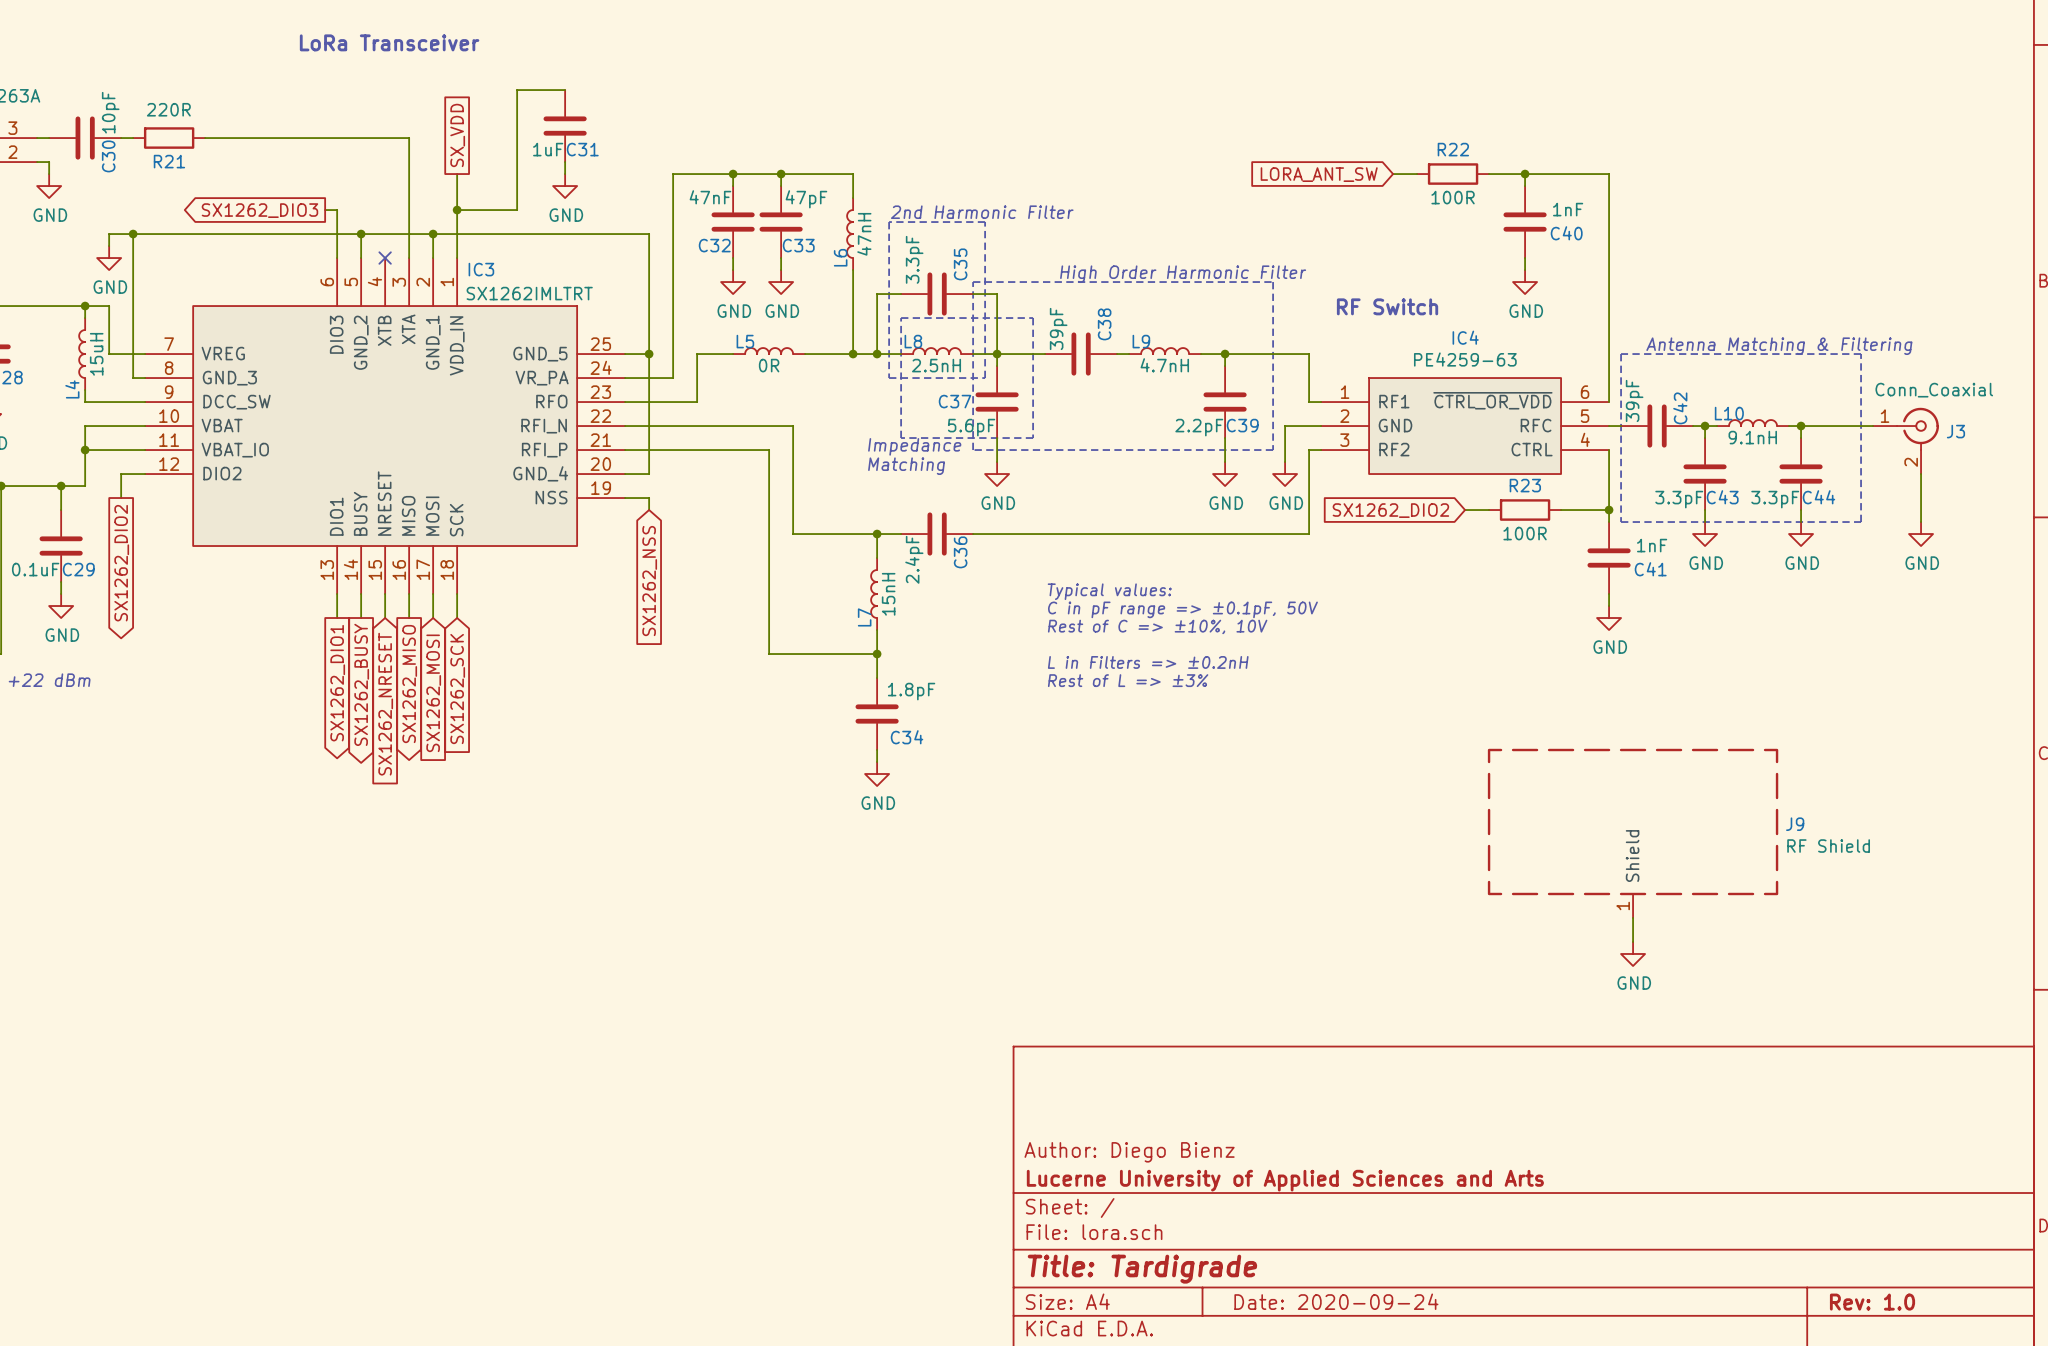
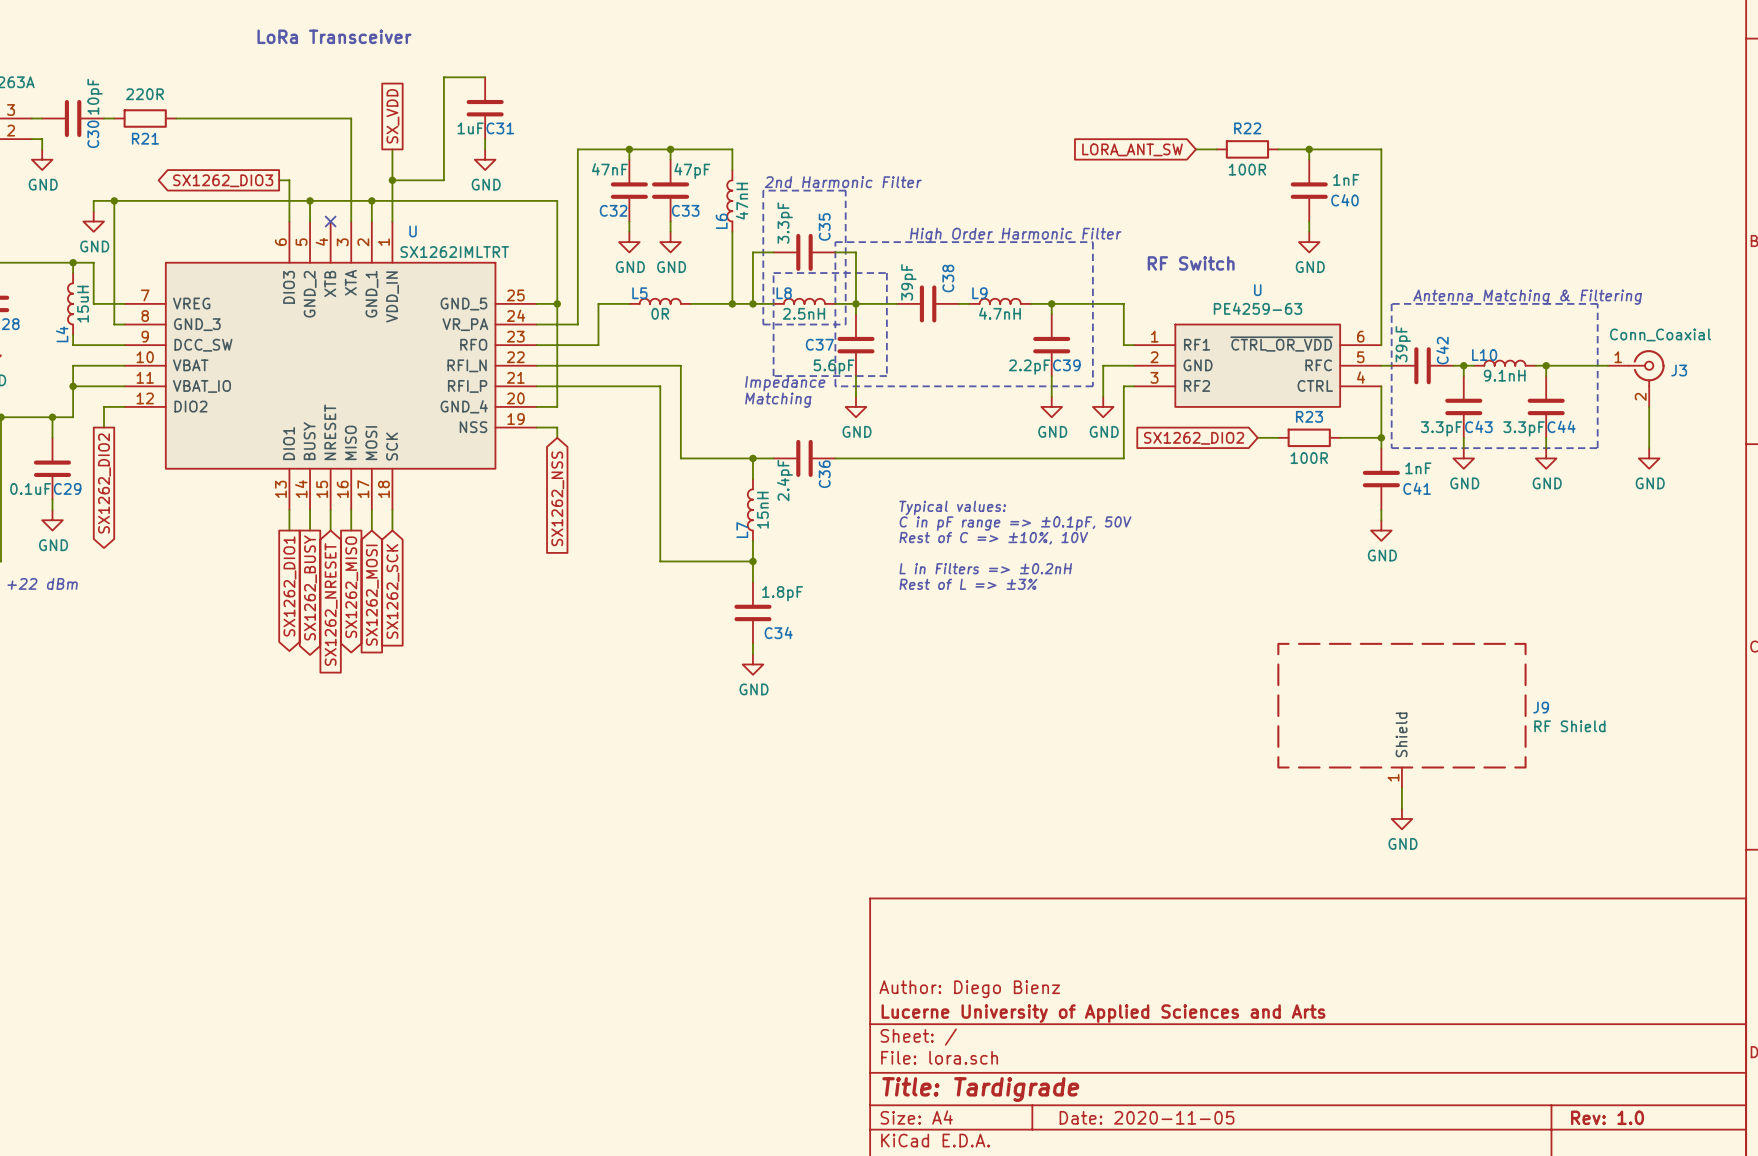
IC3 name: IC3 (481, 269) -> U (413, 231)
IC4 name: IC4 (1465, 337) -> U (1257, 290)
title block: Date: 2020-09-24 (1336, 1301) -> Date: 2020-11-05 (1147, 1117)

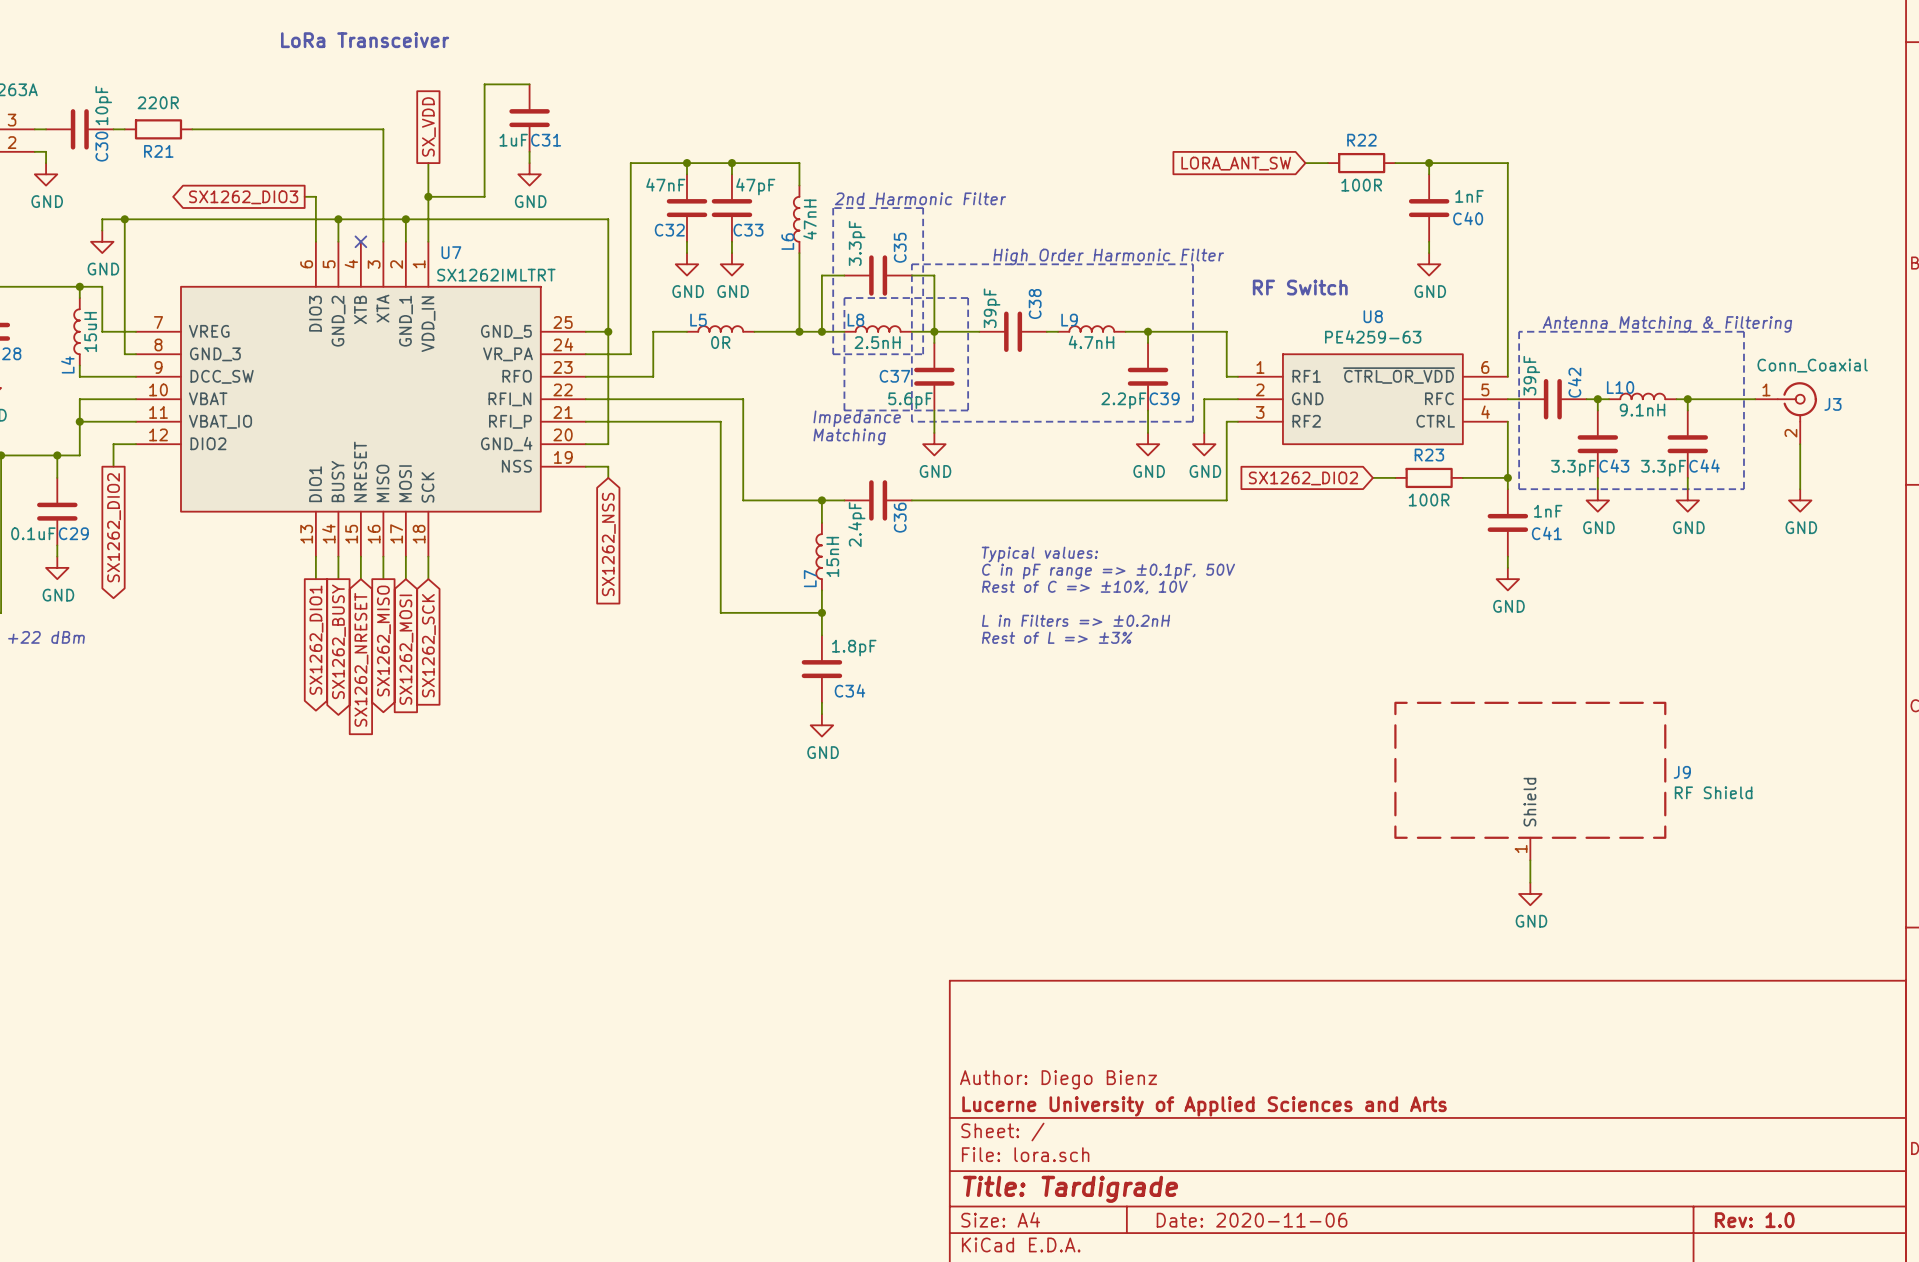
U name: U (413, 231) -> U7 (451, 252)
U name: U (1257, 290) -> U8 (1373, 316)
title block: Date: 2020-11-05 (1147, 1117) -> Date: 2020-11-06 (1252, 1220)

